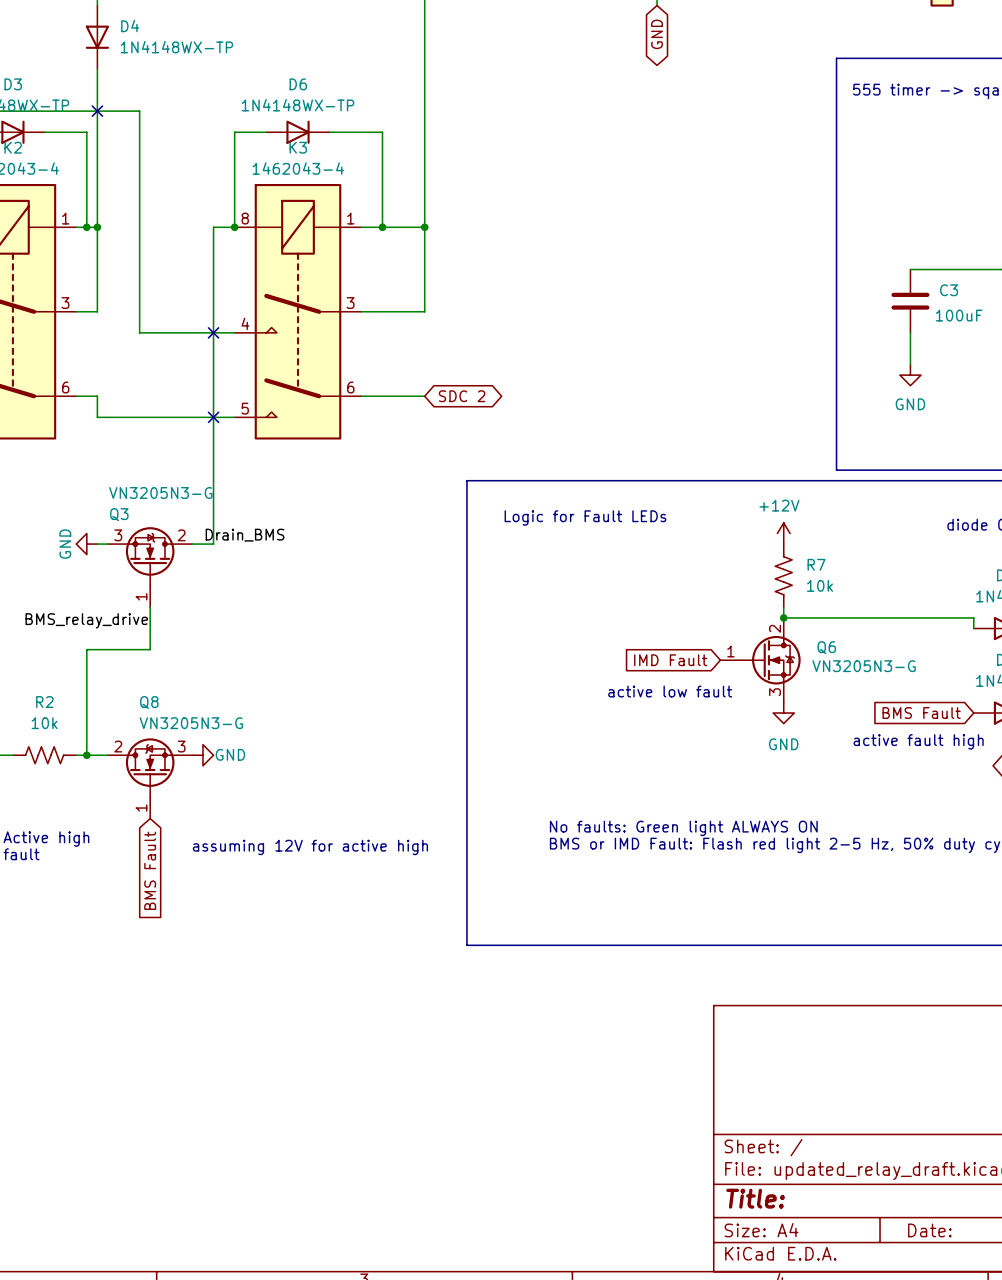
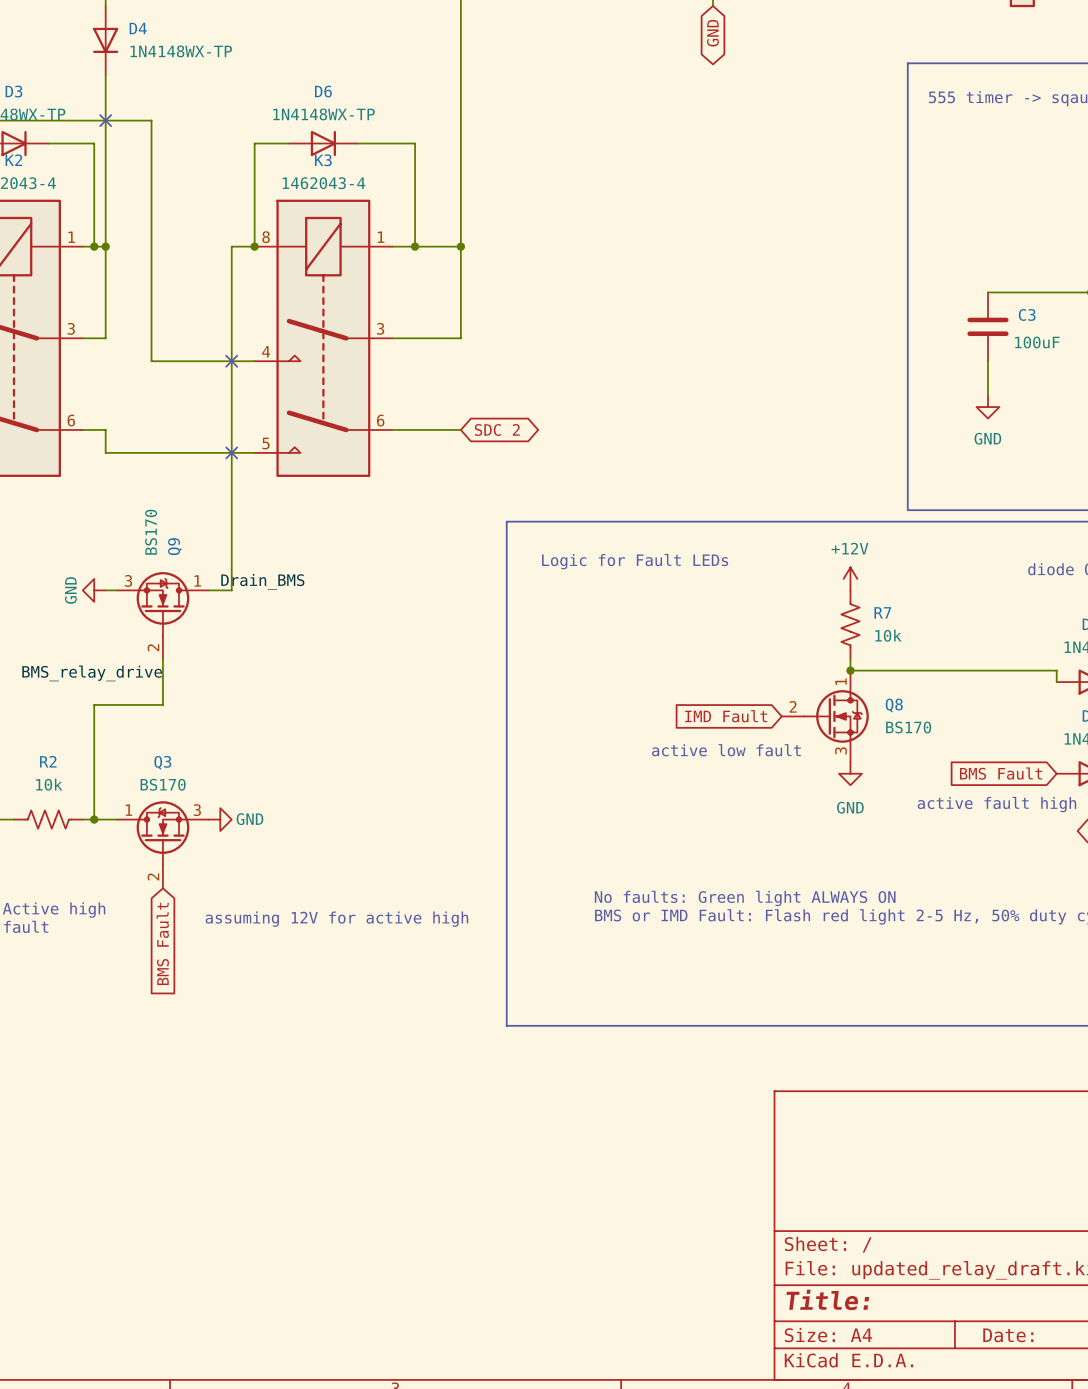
Q3 value: VN3205N3-G (160, 492) -> BS170 (163, 784)
Q3 name position: Q3 (119, 514) -> Q3 (162, 762)
Q3 symbol: [107, 527, 193, 608] -> [117, 801, 209, 889]
Q9: none -> BS170 (162, 615)
Q6: VN3205N3-G (760, 660) -> none
Q8 name position: Q8 (149, 702) -> Q8 (894, 705)
Q8 value: VN3205N3-G (191, 723) -> BS170 (908, 727)
Q8 symbol: [107, 738, 193, 819] -> [781, 670, 869, 763]

